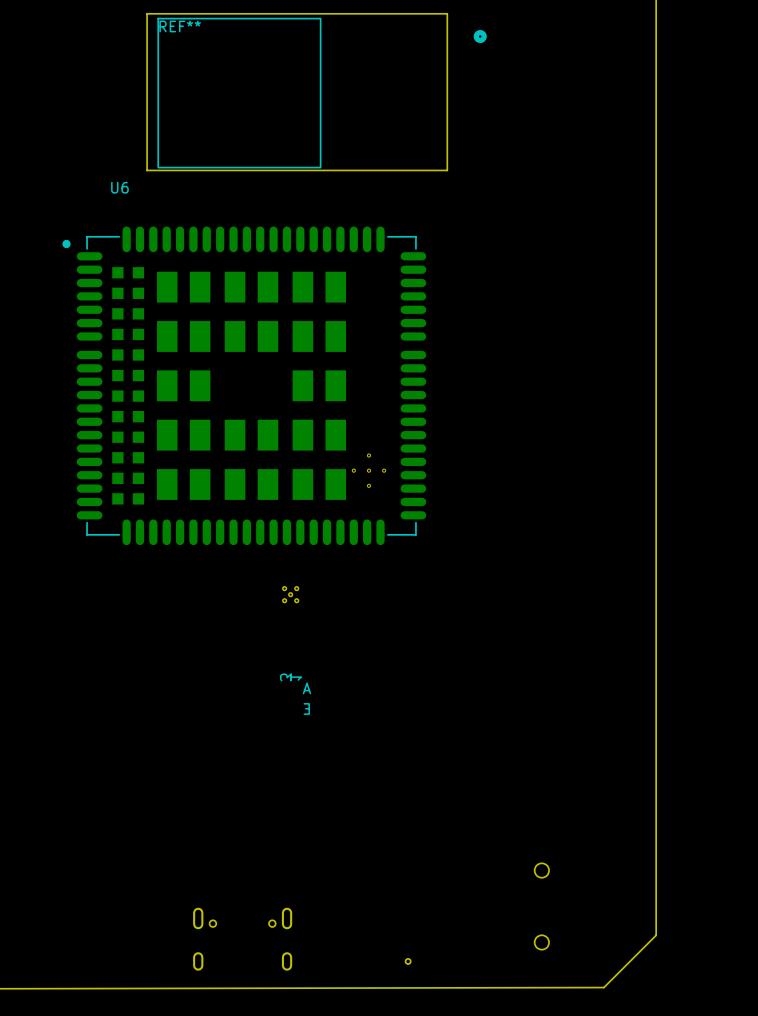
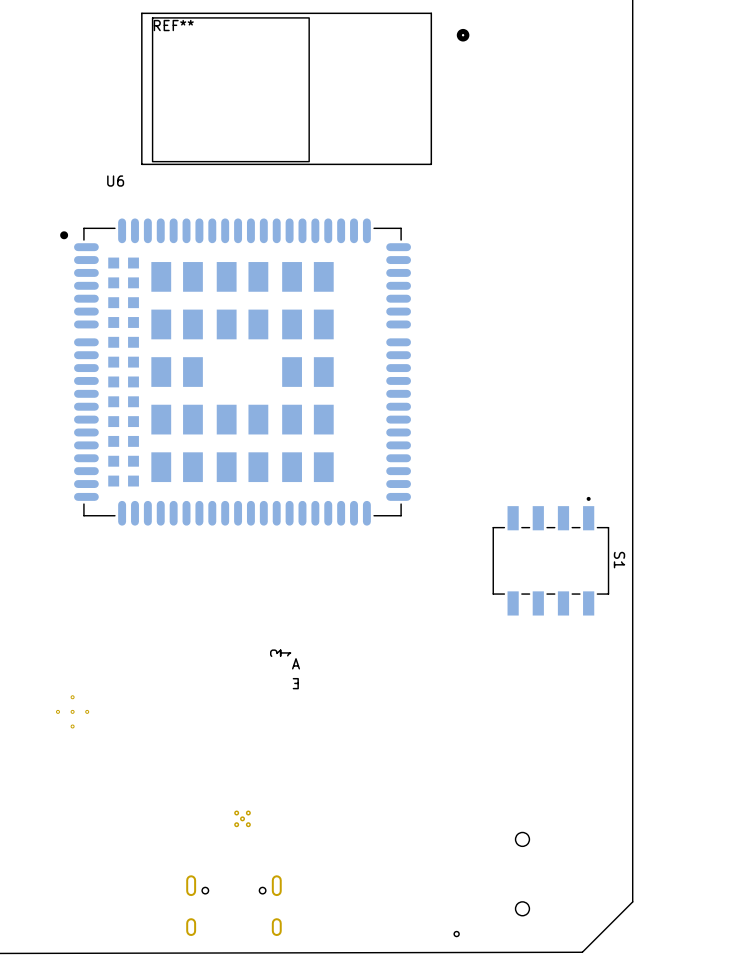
part: (368, 470) -> none
S1: none -> (550, 556)
part: (290, 594) -> none
part: none -> (72, 711)
part: none -> (242, 818)
part position: (408, 961) -> (456, 934)

